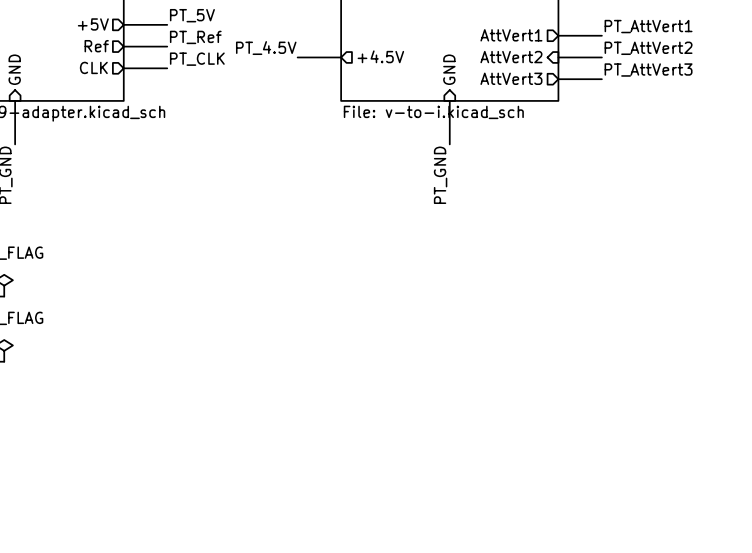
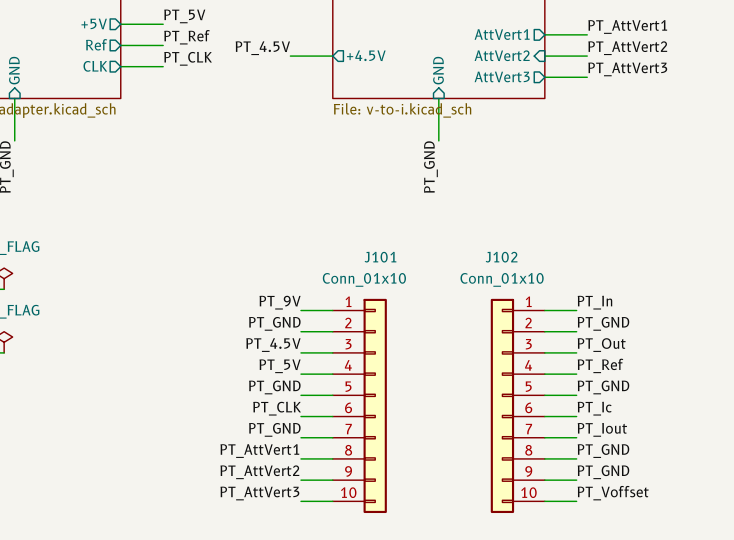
label: none -> PT_9V (280, 302)
label: none -> PT_In (594, 302)
wire: none -> (300, 310) (332, 310)
wire: none -> (544, 310) (576, 310)
label: none -> PT_GND (274, 323)
label: none -> PT_GND (603, 323)
wire: none -> (300, 331) (332, 331)
wire: none -> (544, 331) (576, 331)
label: none -> PT_4.5V (273, 345)
label: none -> PT_Out (601, 345)
wire: none -> (300, 352) (332, 352)
wire: none -> (544, 352) (576, 352)
label: none -> PT_5V (280, 366)
label: none -> PT_Ref (600, 365)
wire: none -> (300, 374) (332, 374)
wire: none -> (544, 374) (576, 374)
label: none -> PT_GND (274, 387)
label: none -> PT_GND (603, 387)
wire: none -> (300, 395) (332, 395)
wire: none -> (544, 395) (576, 395)
J101: none -> Conn_01x10 (359, 405)
J102: none -> Conn_01x10 (517, 405)
label: none -> PT_CLK (277, 408)
label: none -> PT_Ic (594, 408)
wire: none -> (300, 416) (332, 416)
wire: none -> (544, 416) (576, 416)
label: none -> PT_GND (274, 429)
label: none -> PT_Iout (602, 429)
wire: none -> (300, 437) (332, 437)
wire: none -> (544, 437) (576, 437)
label: none -> PT_AttVert1 (259, 451)
label: none -> PT_GND (603, 451)
wire: none -> (300, 458) (332, 458)
wire: none -> (544, 458) (576, 458)
label: none -> PT_AttVert2 (259, 472)
label: none -> PT_GND (603, 472)
wire: none -> (300, 480) (332, 480)
wire: none -> (544, 480) (576, 480)
label: none -> PT_AttVert3 (259, 493)
label: none -> PT_Voffset (613, 493)
wire: none -> (300, 501) (332, 501)
wire: none -> (544, 501) (576, 501)

